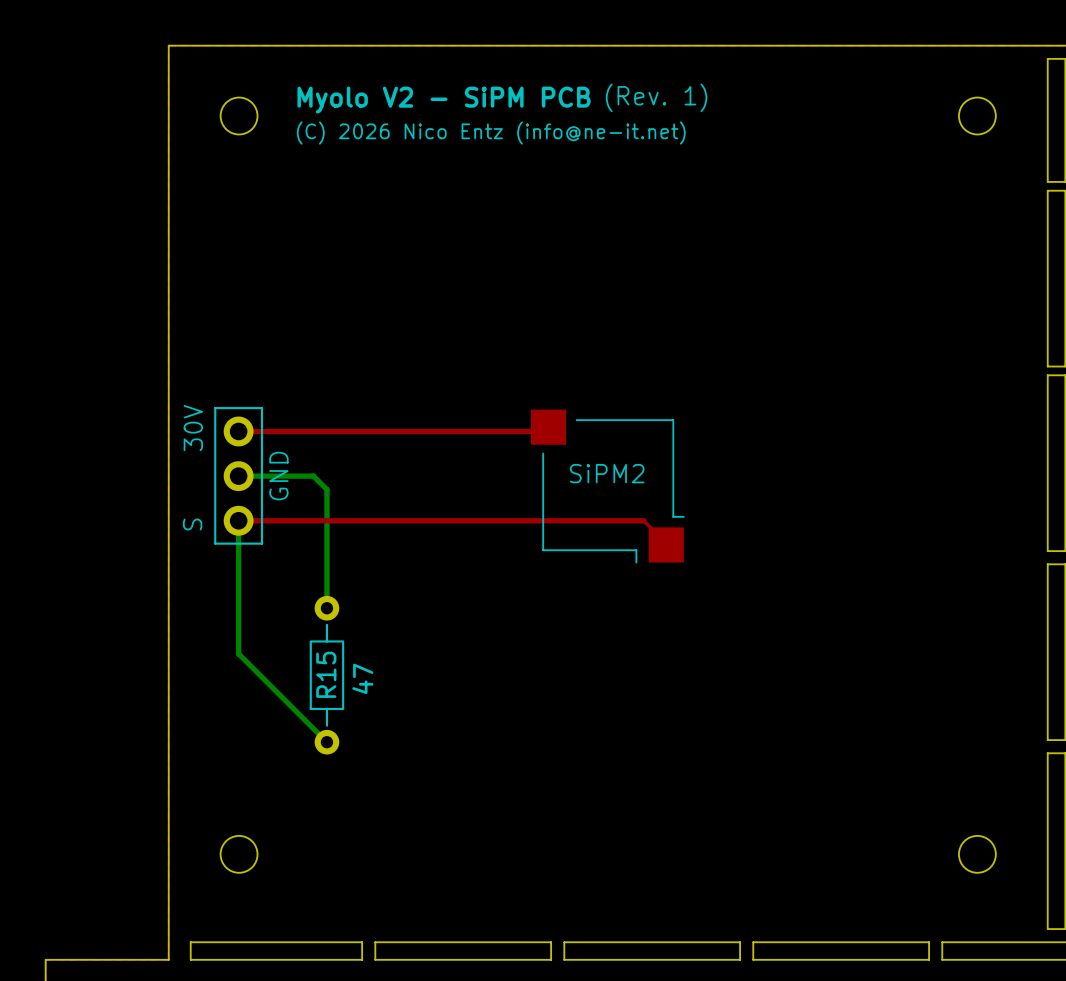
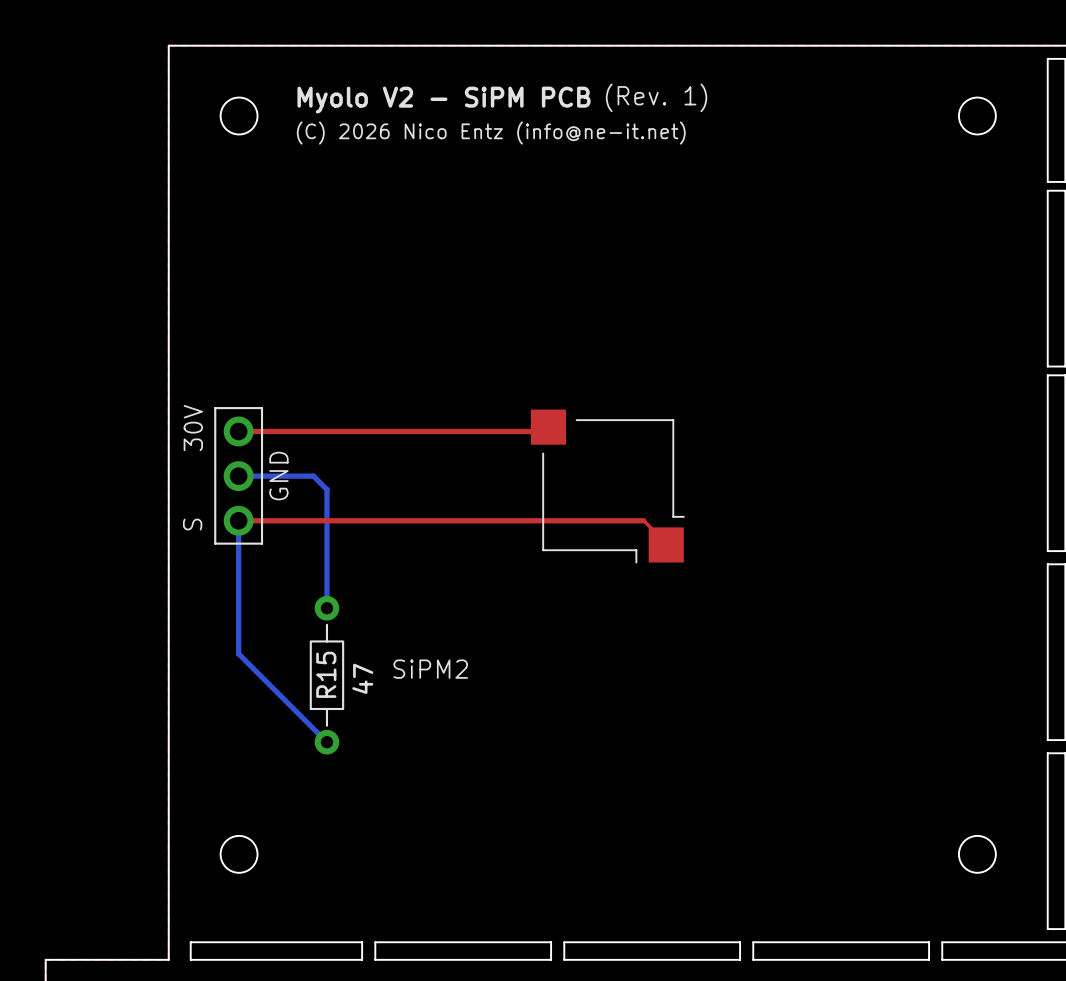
SiPM2 name position: SiPM2 (607, 473) -> SiPM2 (430, 669)

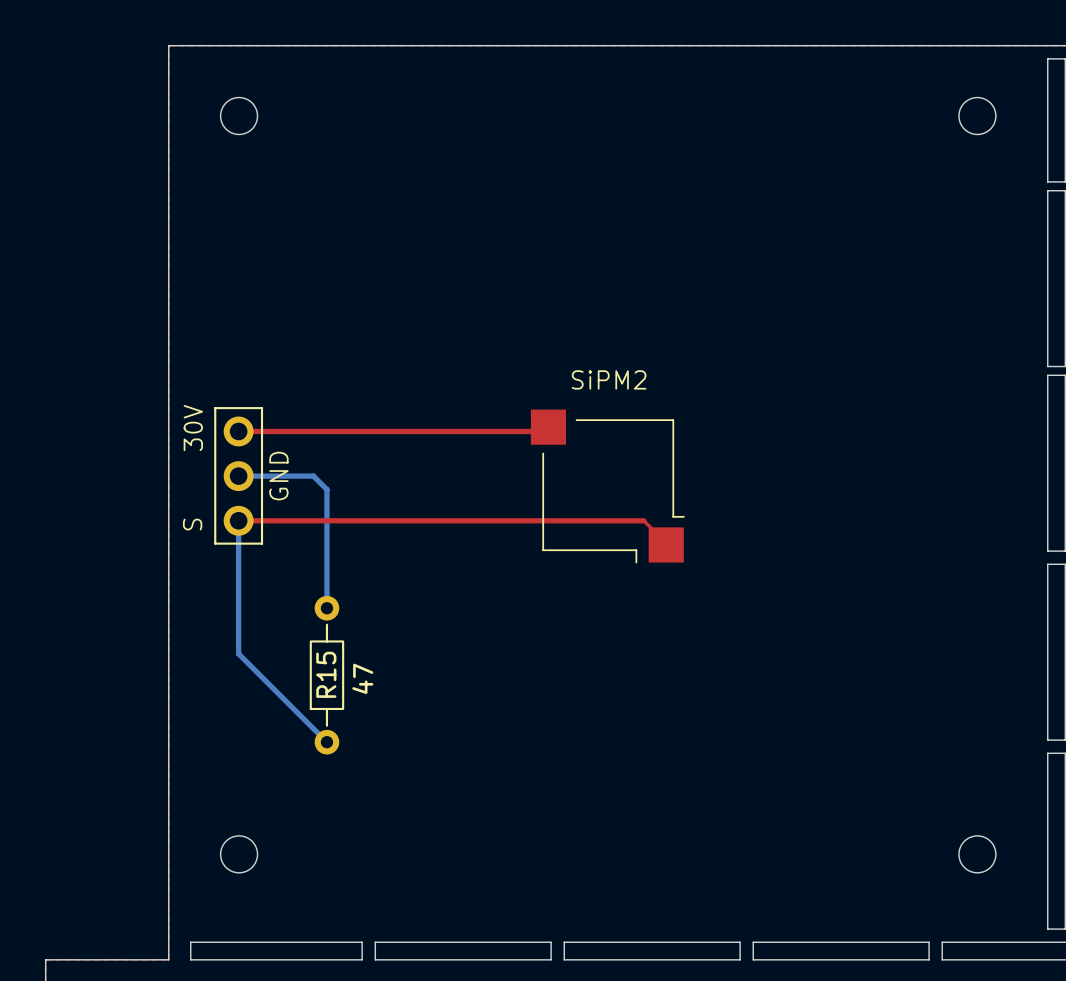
text: (Rev. 1) (656, 97) -> none
text: Myolo V2 - SiPM PCB (444, 100) -> none
text: (C) 2026 Nico Entz (info@ne-it.net) (491, 133) -> none
SiPM2 name position: SiPM2 (430, 669) -> SiPM2 (609, 379)

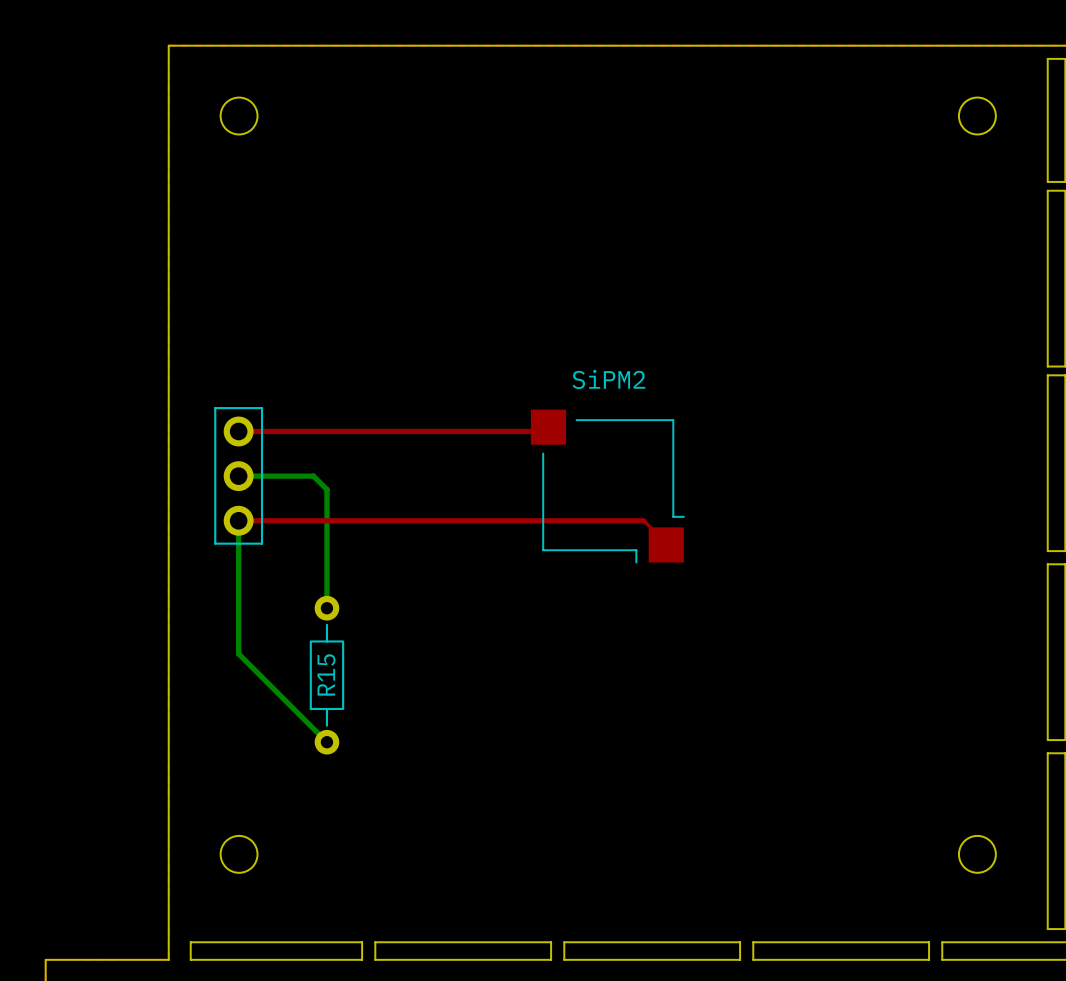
text: 30V (193, 428) -> none
text: GND (278, 476) -> none
text: S (192, 524) -> none
text: 47 (362, 678) -> none

